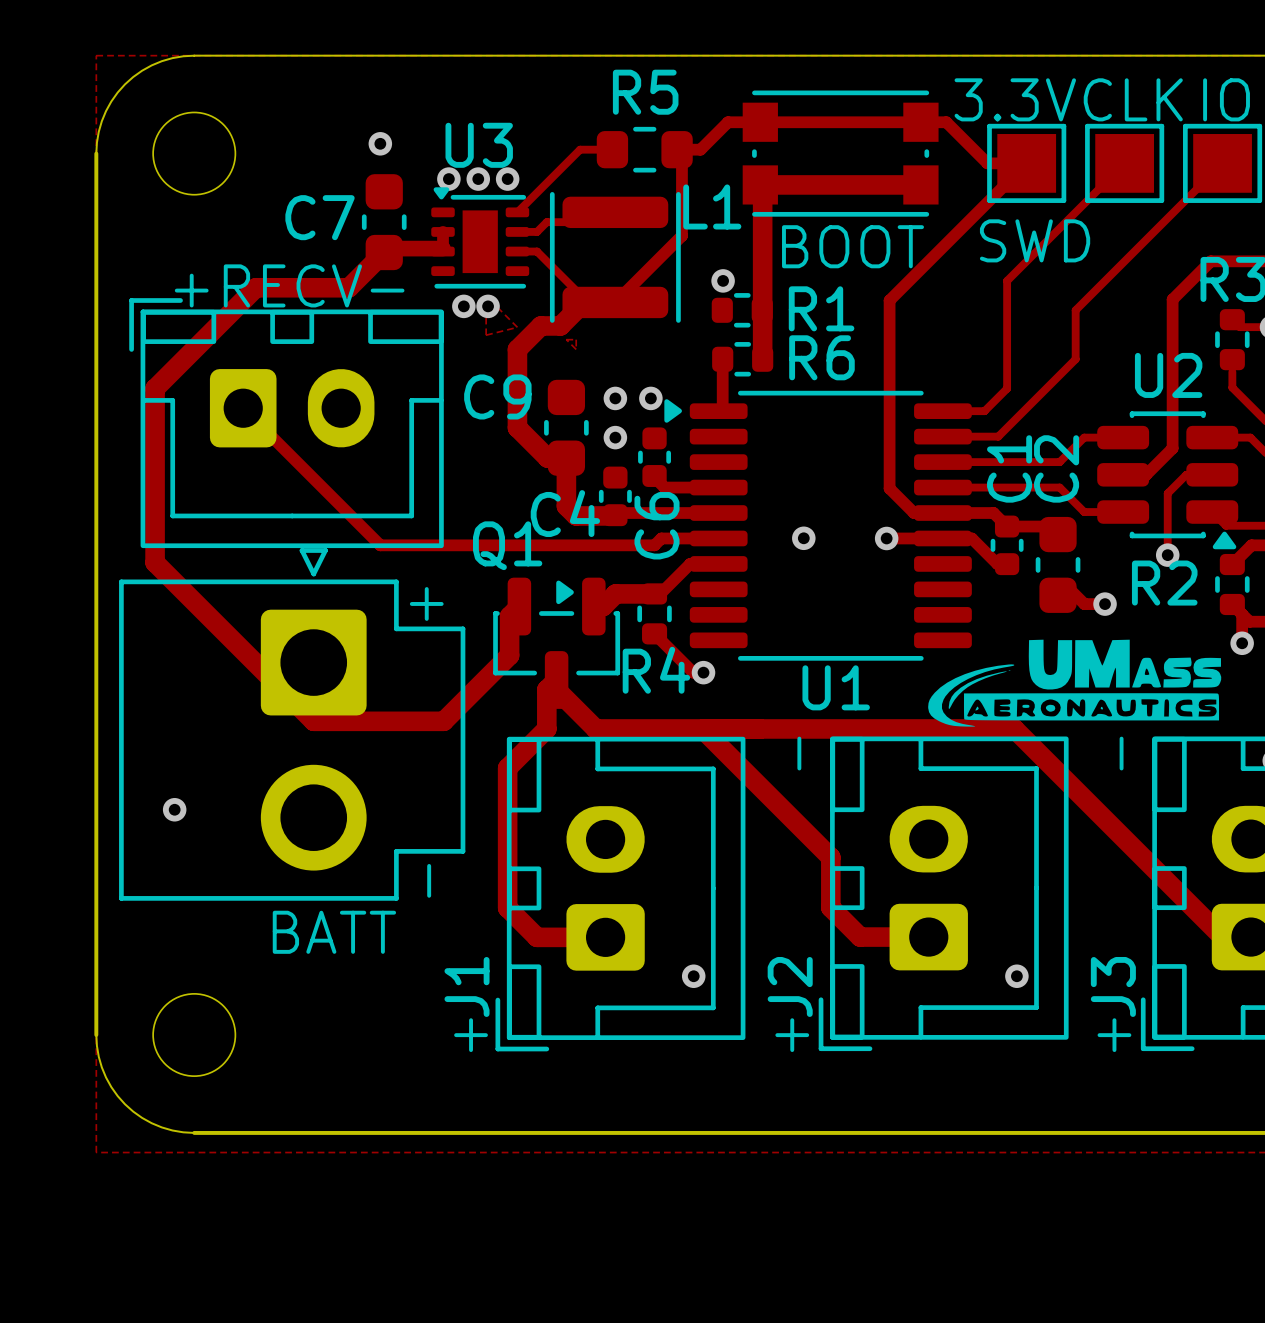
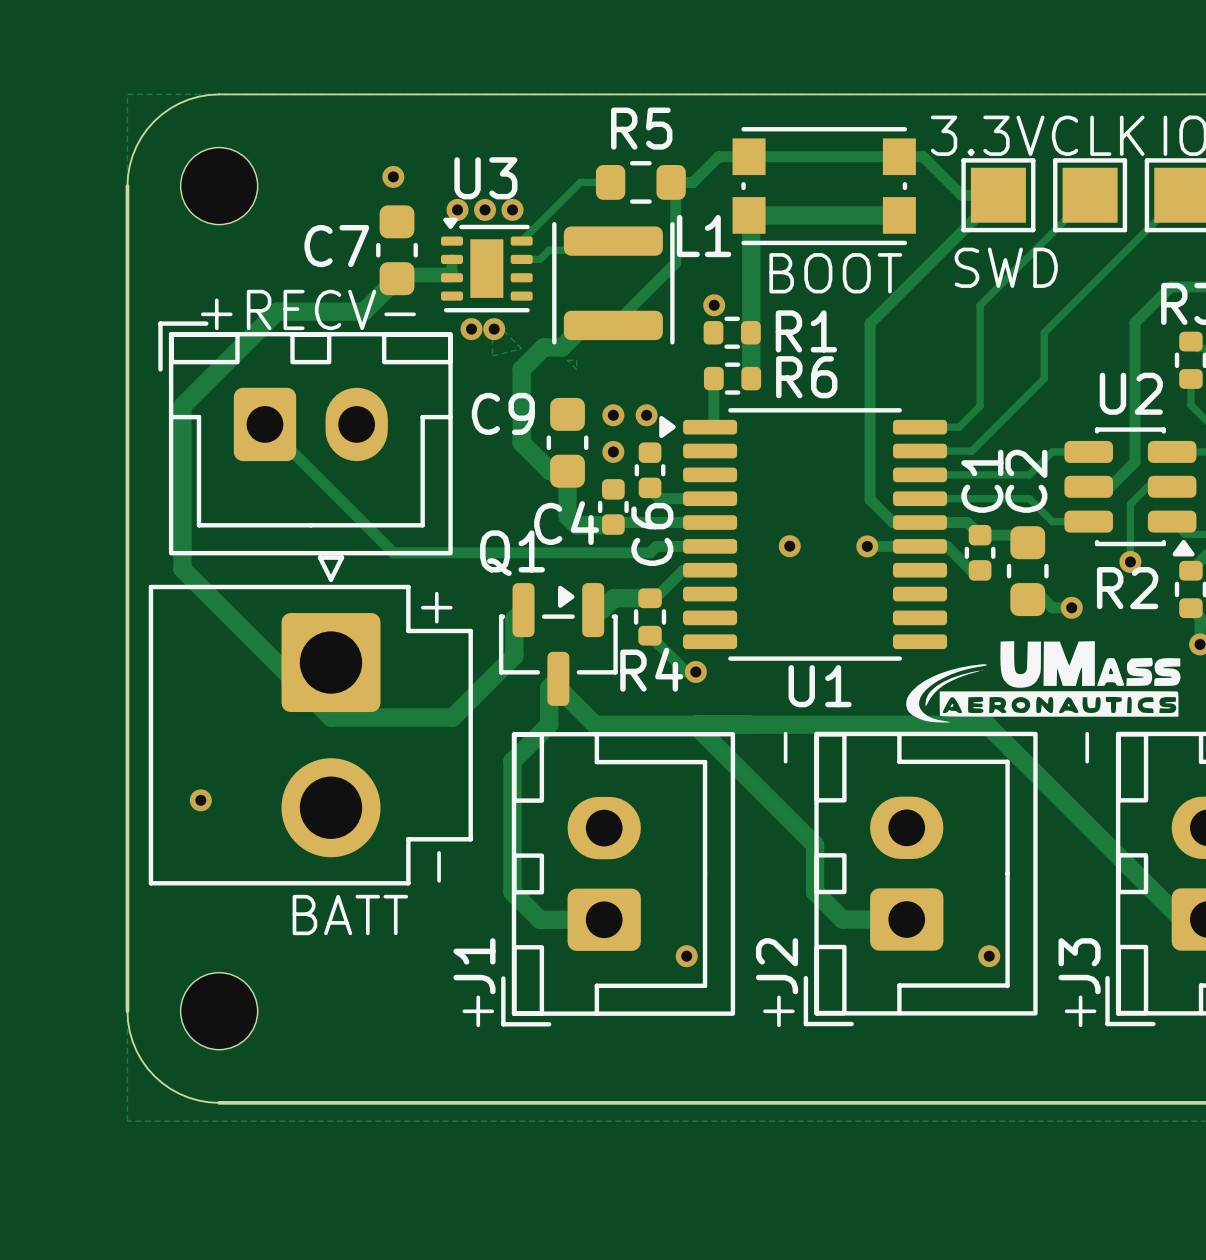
track: (517, 251) (537, 251) (587, 302) (615, 302) -> none

